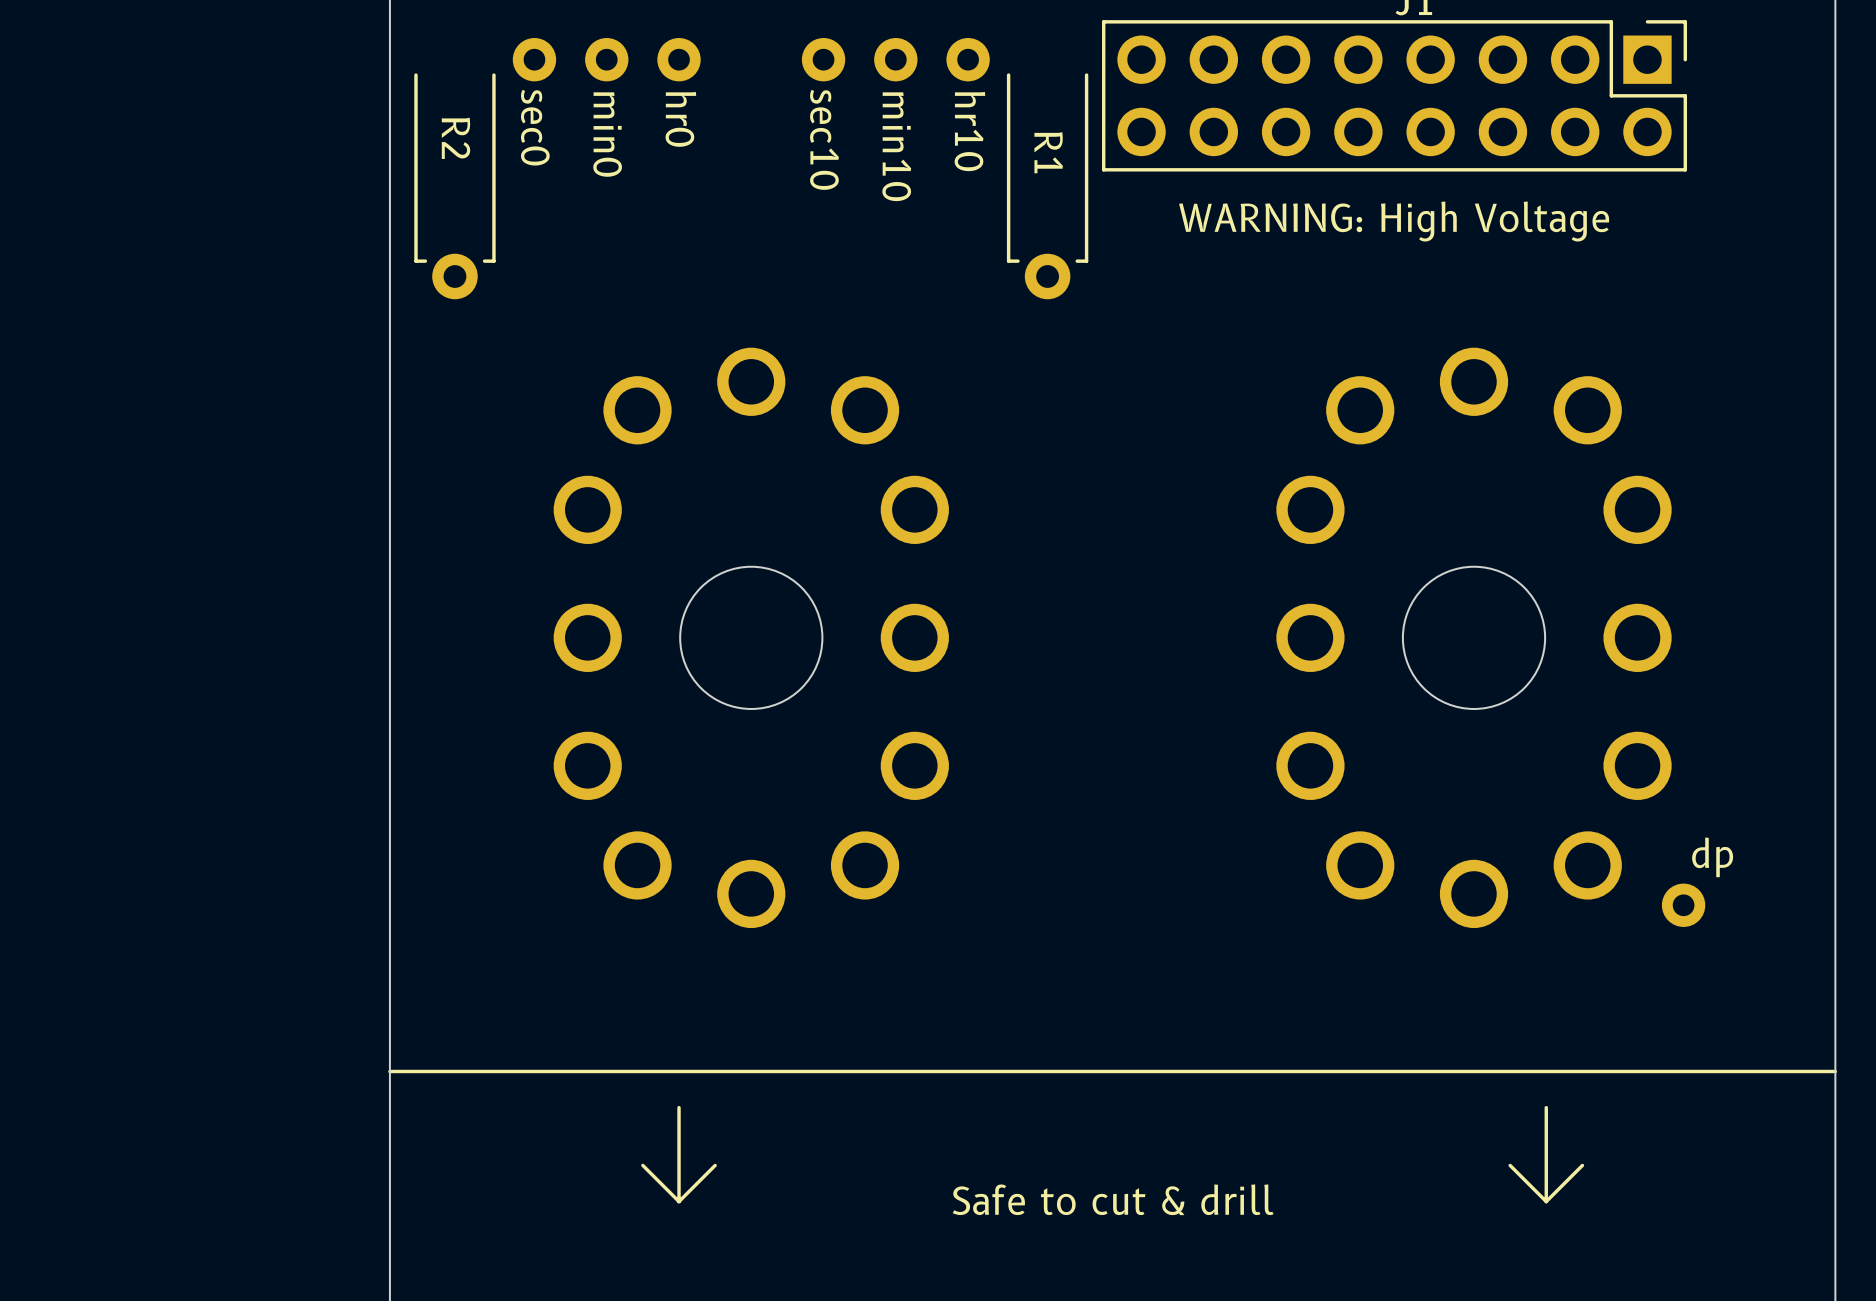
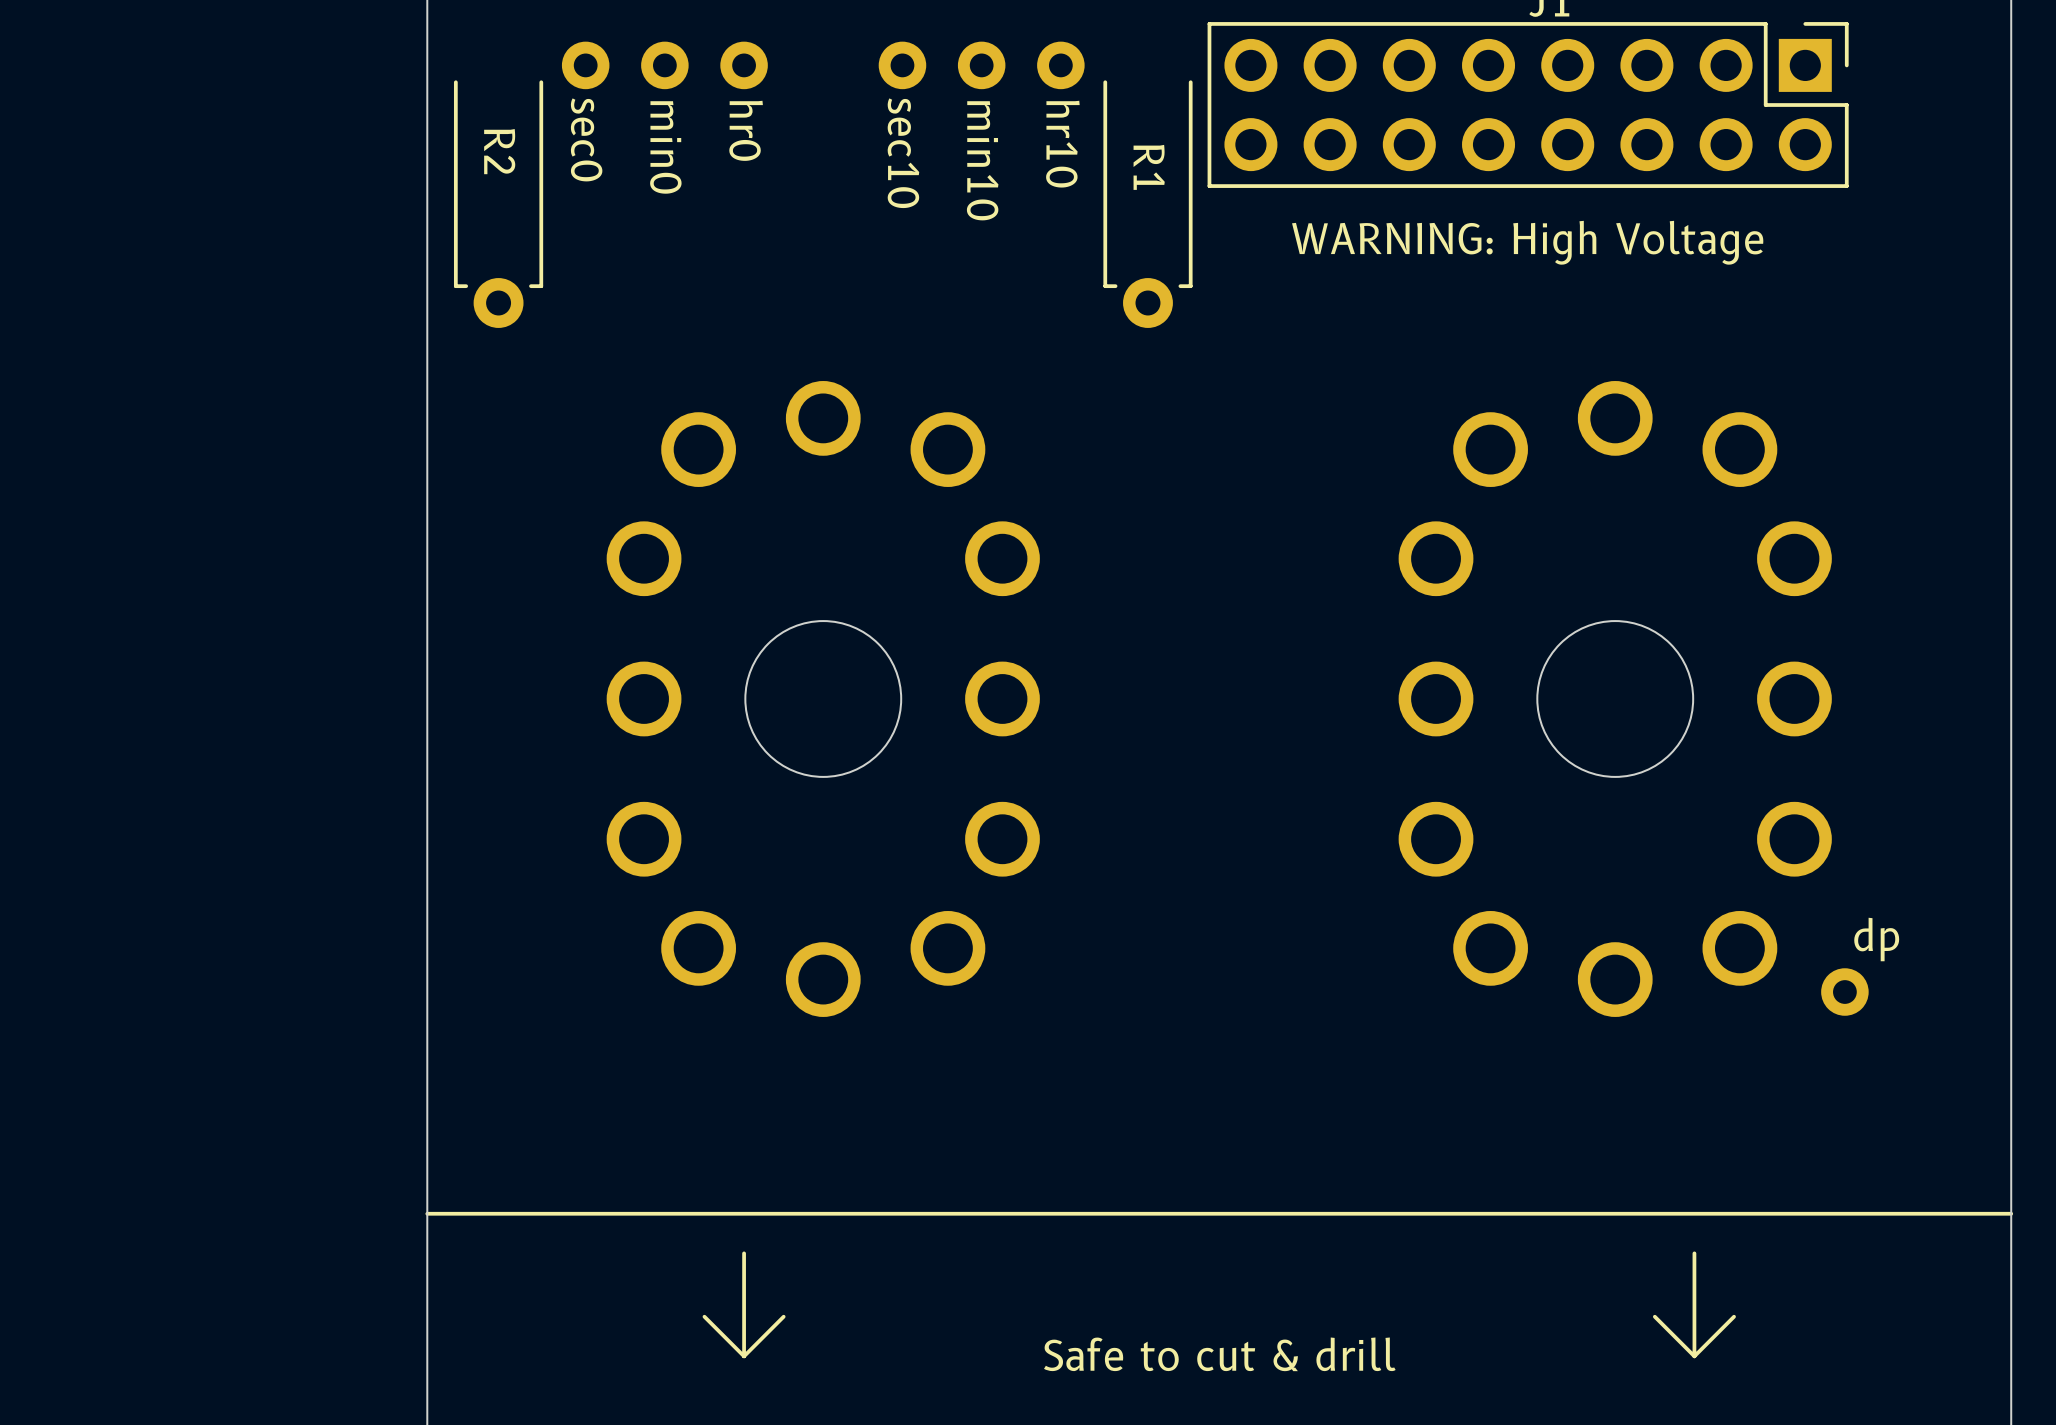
line: (1835, 1071) (389, 1071) -> (2011, 1213) (427, 1213)
line: (679, 1107) (679, 1143) -> (744, 1316) (744, 1356)
line: (1546, 1107) (1546, 1143) -> (1694, 1316) (1694, 1356)
line: (715, 1165) (679, 1201) (642, 1165) -> none
line: (1582, 1165) (1546, 1201) (1510, 1165) -> none
text position: Safe to cut & drill (1113, 1199) -> Safe to cut & drill (1219, 1354)
line: none -> (704, 1316) (744, 1356)
line: none -> (783, 1316) (744, 1356)
line: none -> (1654, 1316) (1694, 1356)
line: none -> (1734, 1316) (1694, 1356)

